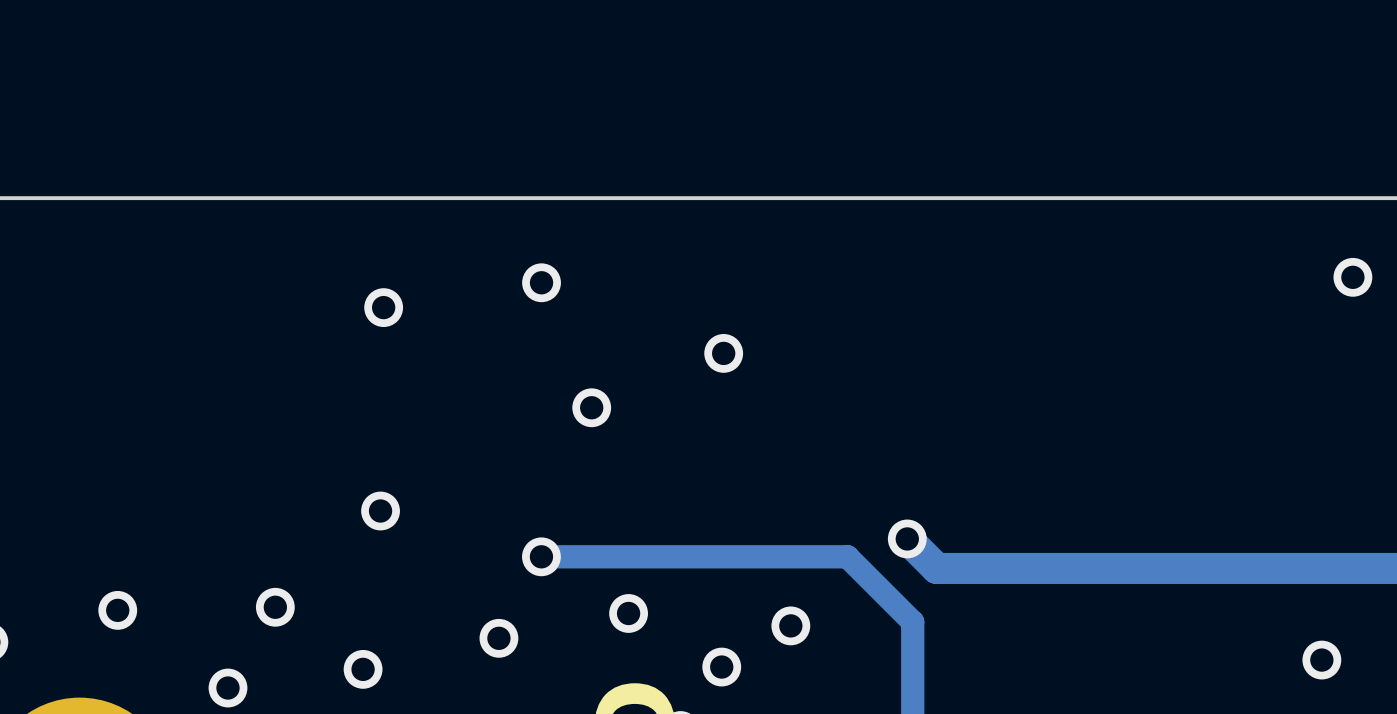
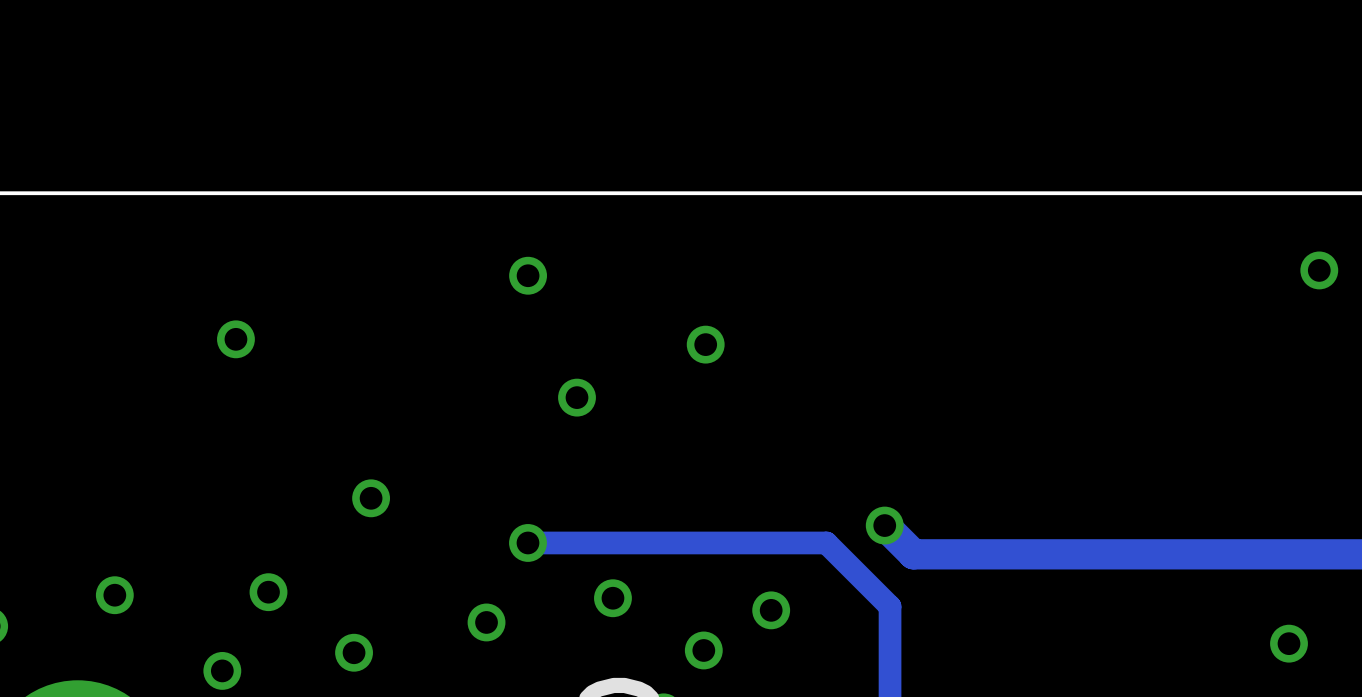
via position: (383, 307) -> (235, 339)

